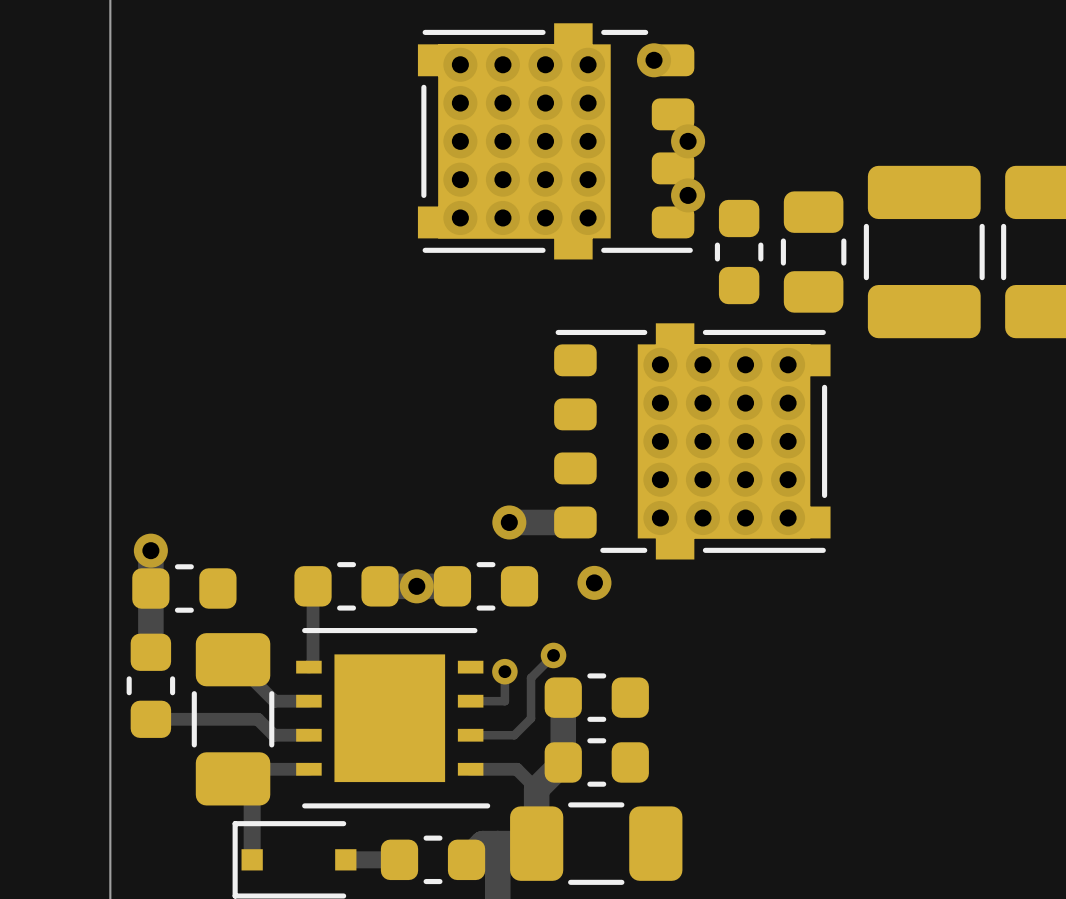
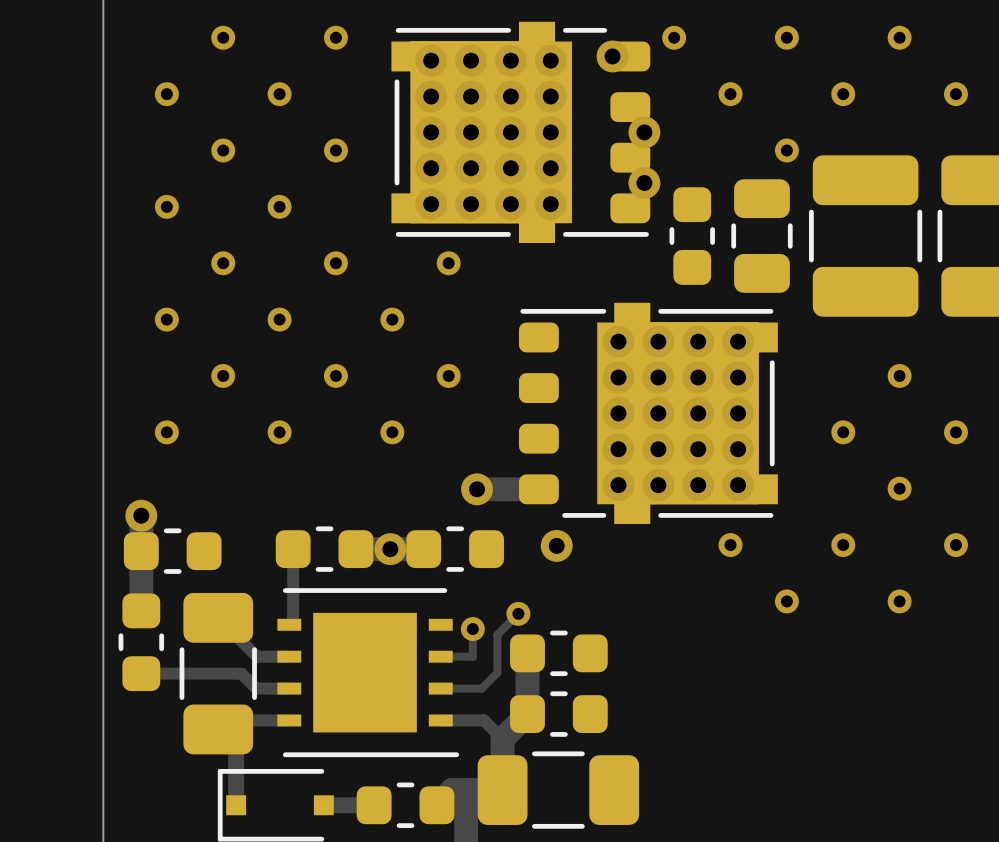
via: none -> (223, 37)
via: none -> (335, 37)
via: none -> (674, 37)
via: none -> (786, 37)
via: none -> (899, 37)
via: none -> (166, 94)
via: none -> (279, 94)
via: none -> (730, 94)
via: none -> (843, 94)
via: none -> (955, 94)
via: none -> (223, 150)
via: none -> (335, 150)
via: none -> (786, 150)
via: none -> (166, 206)
via: none -> (279, 206)
via: none -> (223, 263)
via: none -> (335, 263)
via: none -> (448, 263)
via: none -> (166, 319)
via: none -> (279, 319)
via: none -> (392, 319)
via: none -> (223, 375)
via: none -> (335, 375)
via: none -> (448, 375)
via: none -> (899, 375)
via: none -> (166, 432)
via: none -> (279, 432)
via: none -> (392, 432)
via: none -> (843, 432)
via: none -> (955, 432)
via: none -> (899, 488)
via: none -> (730, 545)
via: none -> (843, 545)
via: none -> (955, 545)
via: none -> (786, 601)
via: none -> (899, 601)

